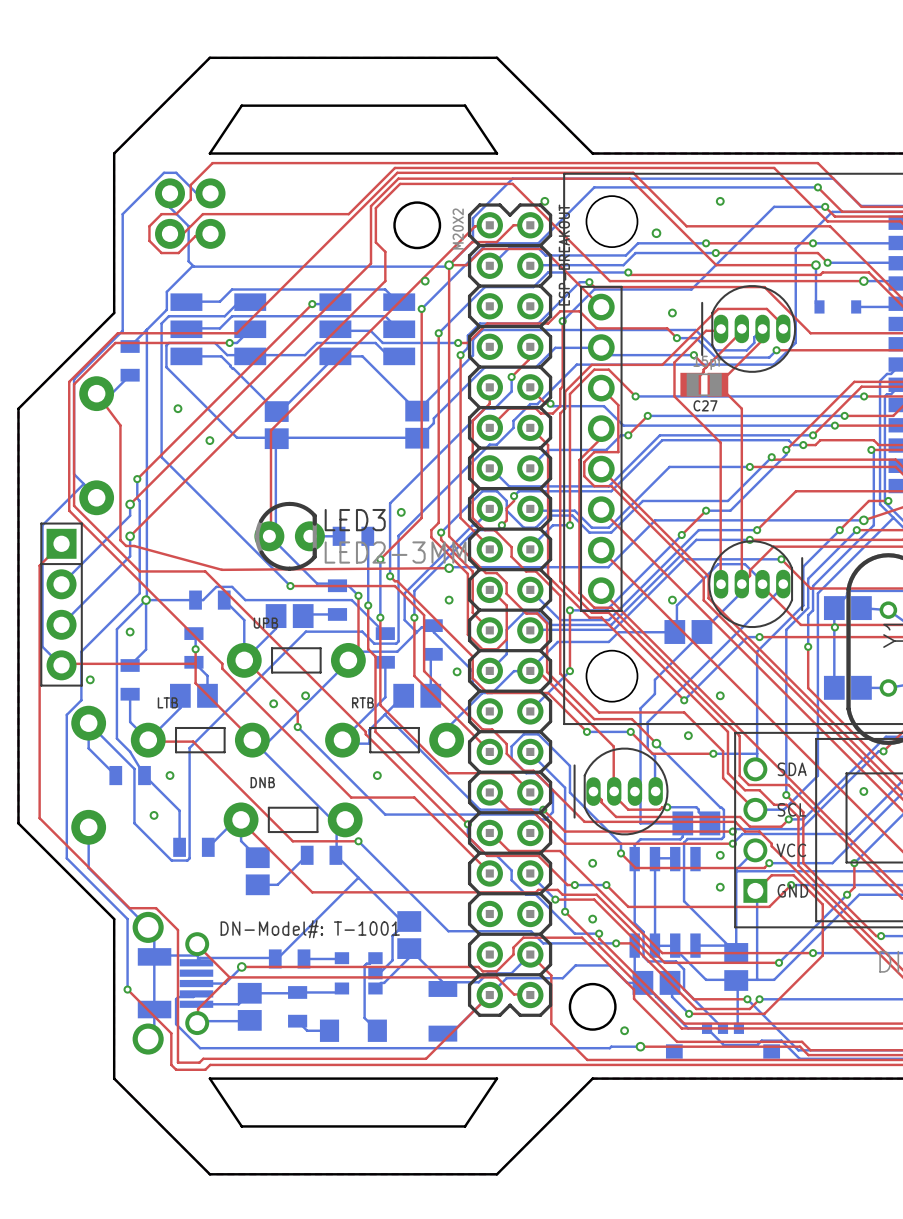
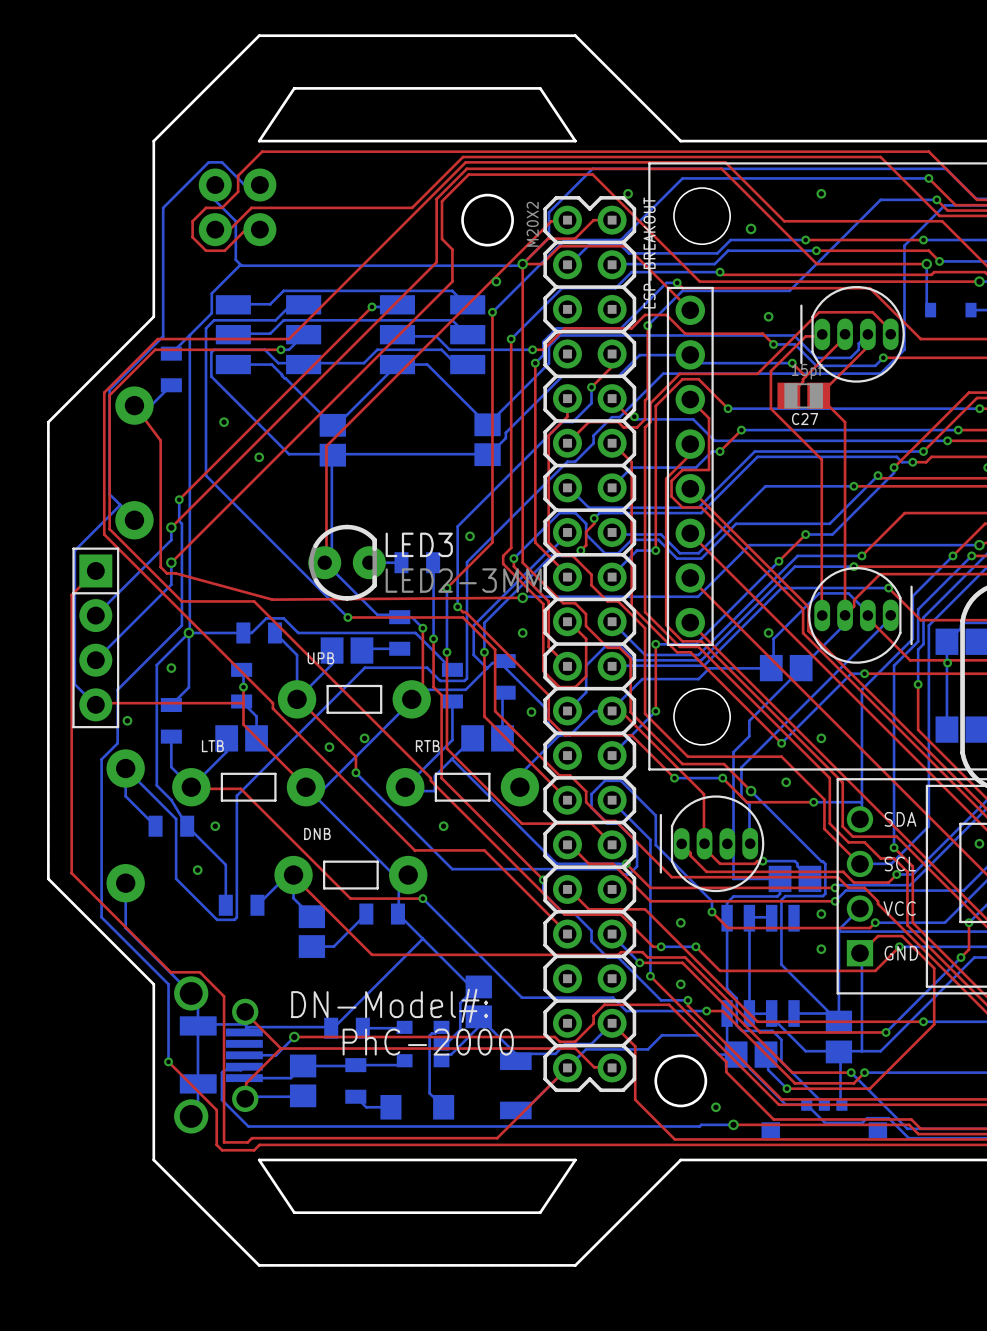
text: DN-Model#: T-1001 (310, 929) -> DN-Model#: (389, 1005)
text: none -> PhC-2000 (428, 1042)

